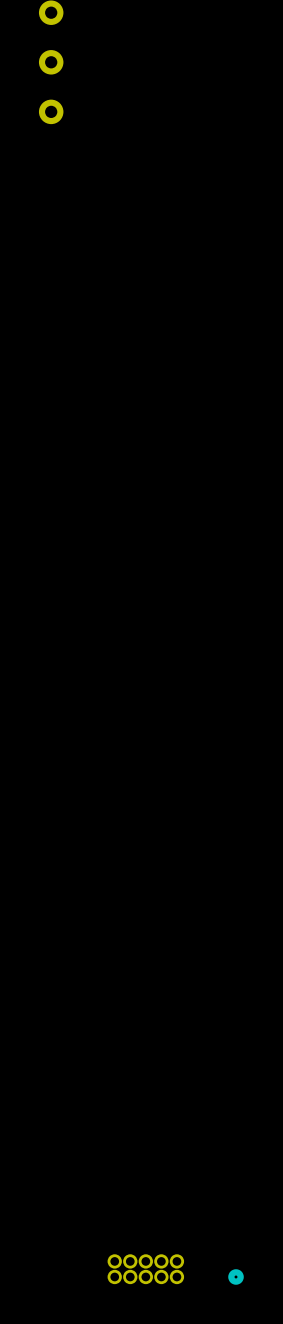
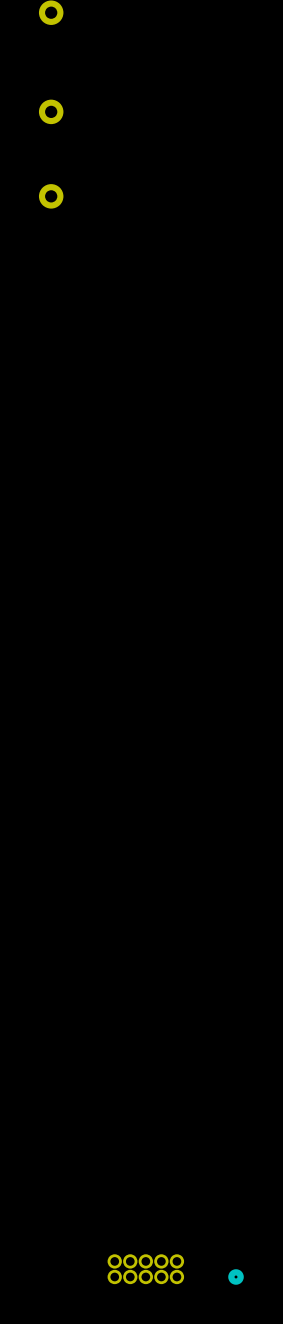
part position: (51, 62) -> (51, 196)

